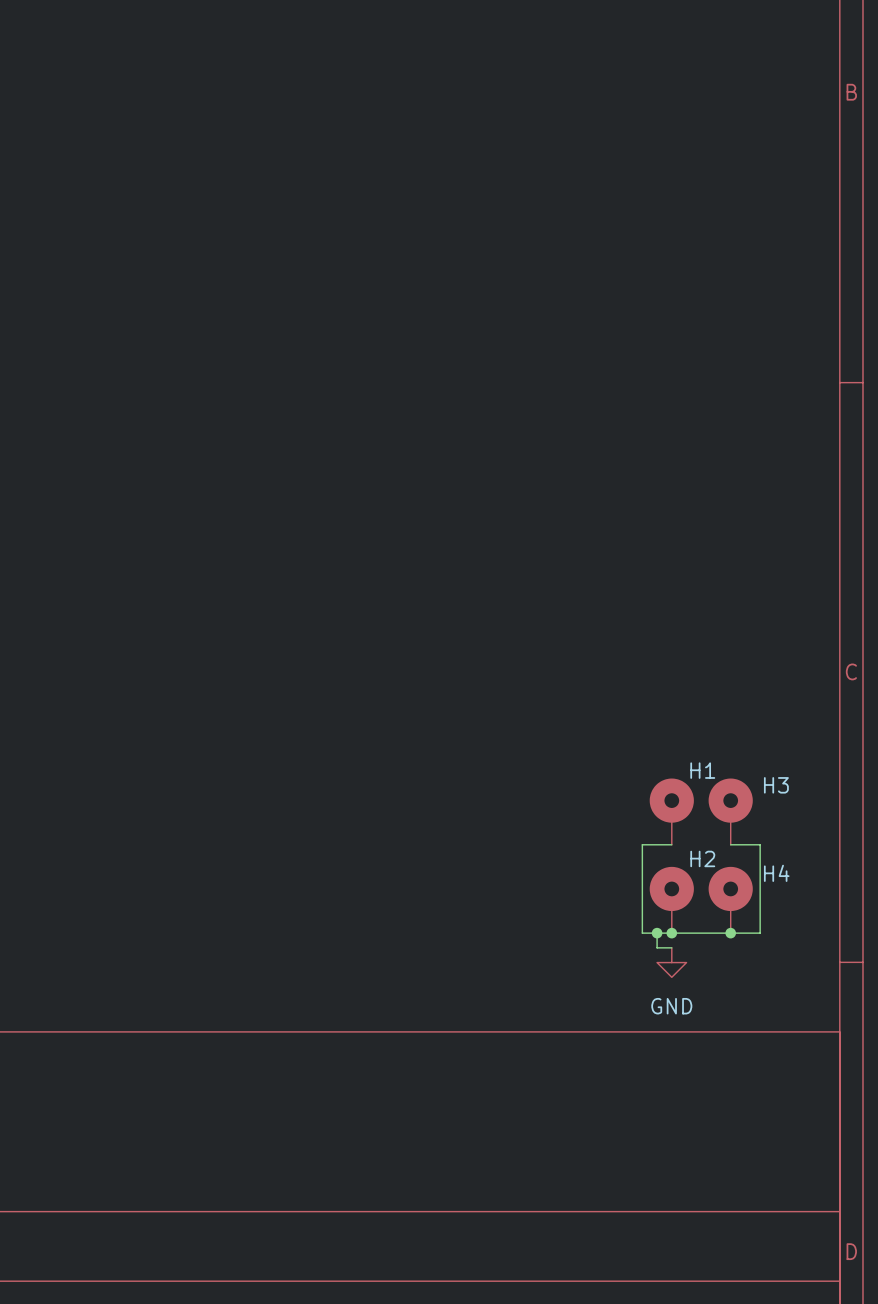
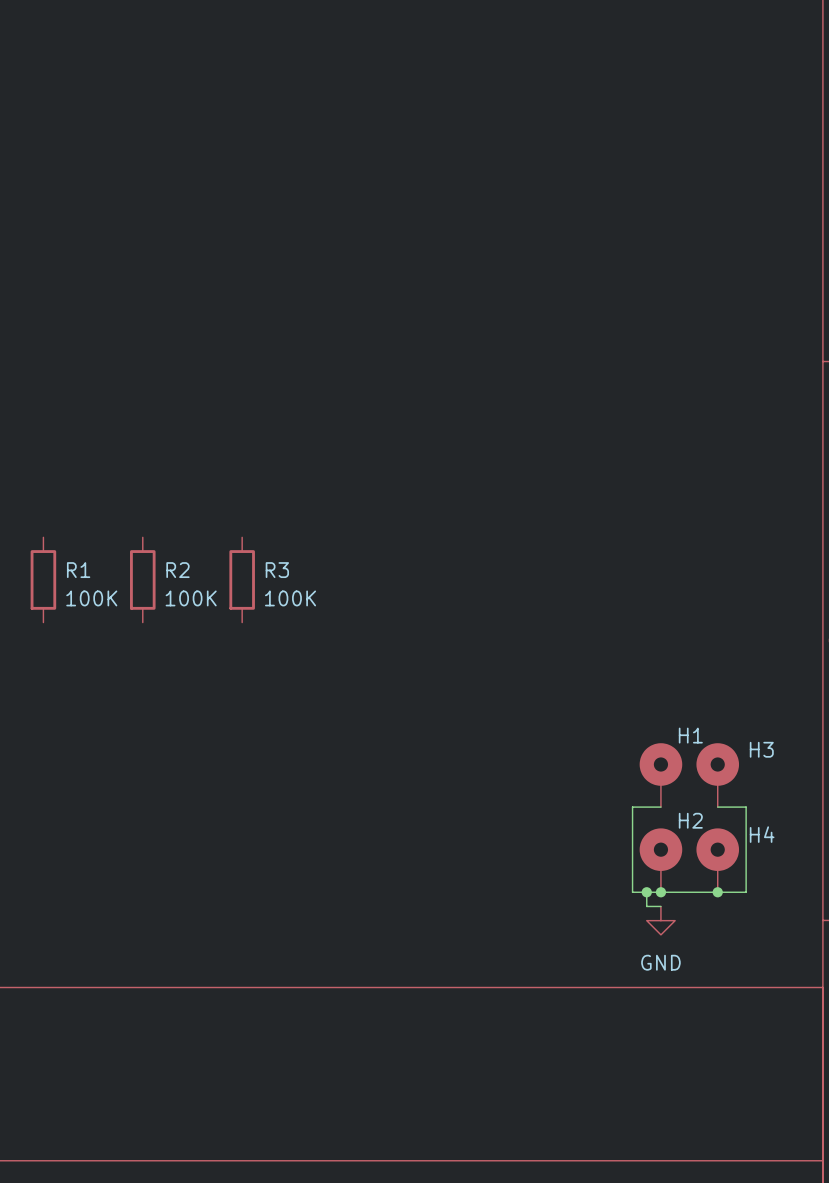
R1: none -> 100K (43, 579)
R2: none -> 100K (142, 579)
R3: none -> 100K (242, 579)

